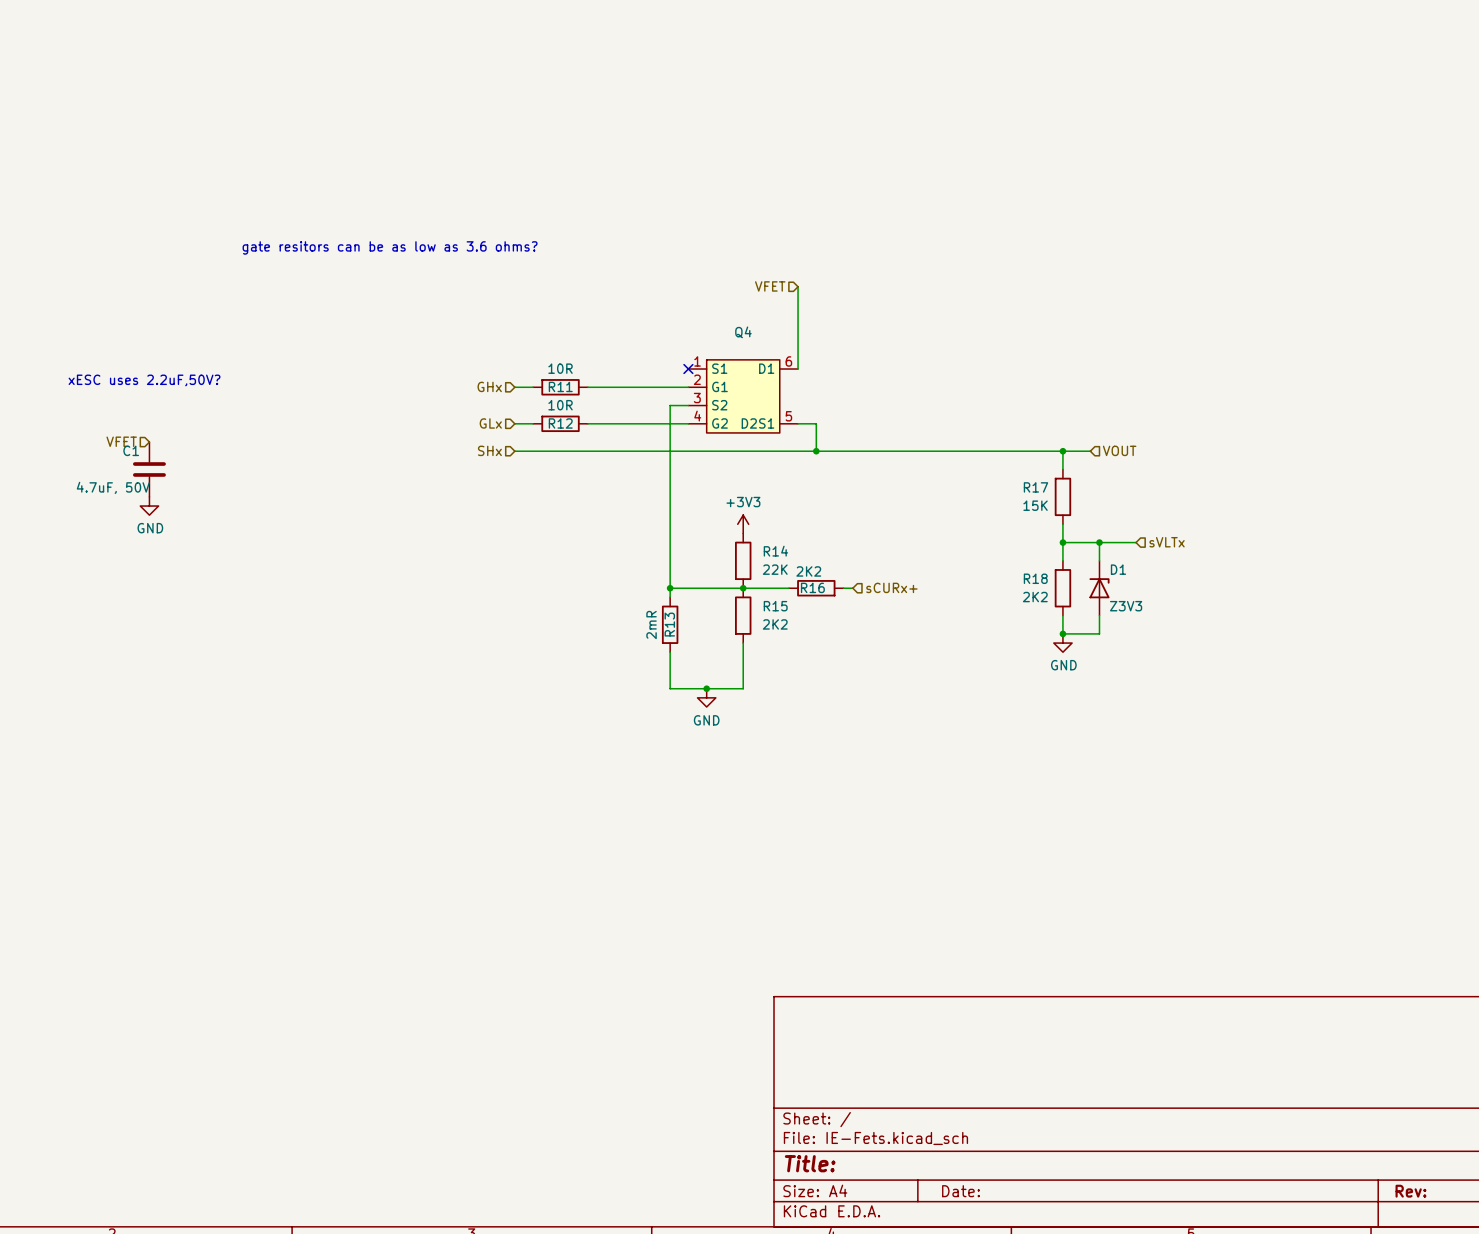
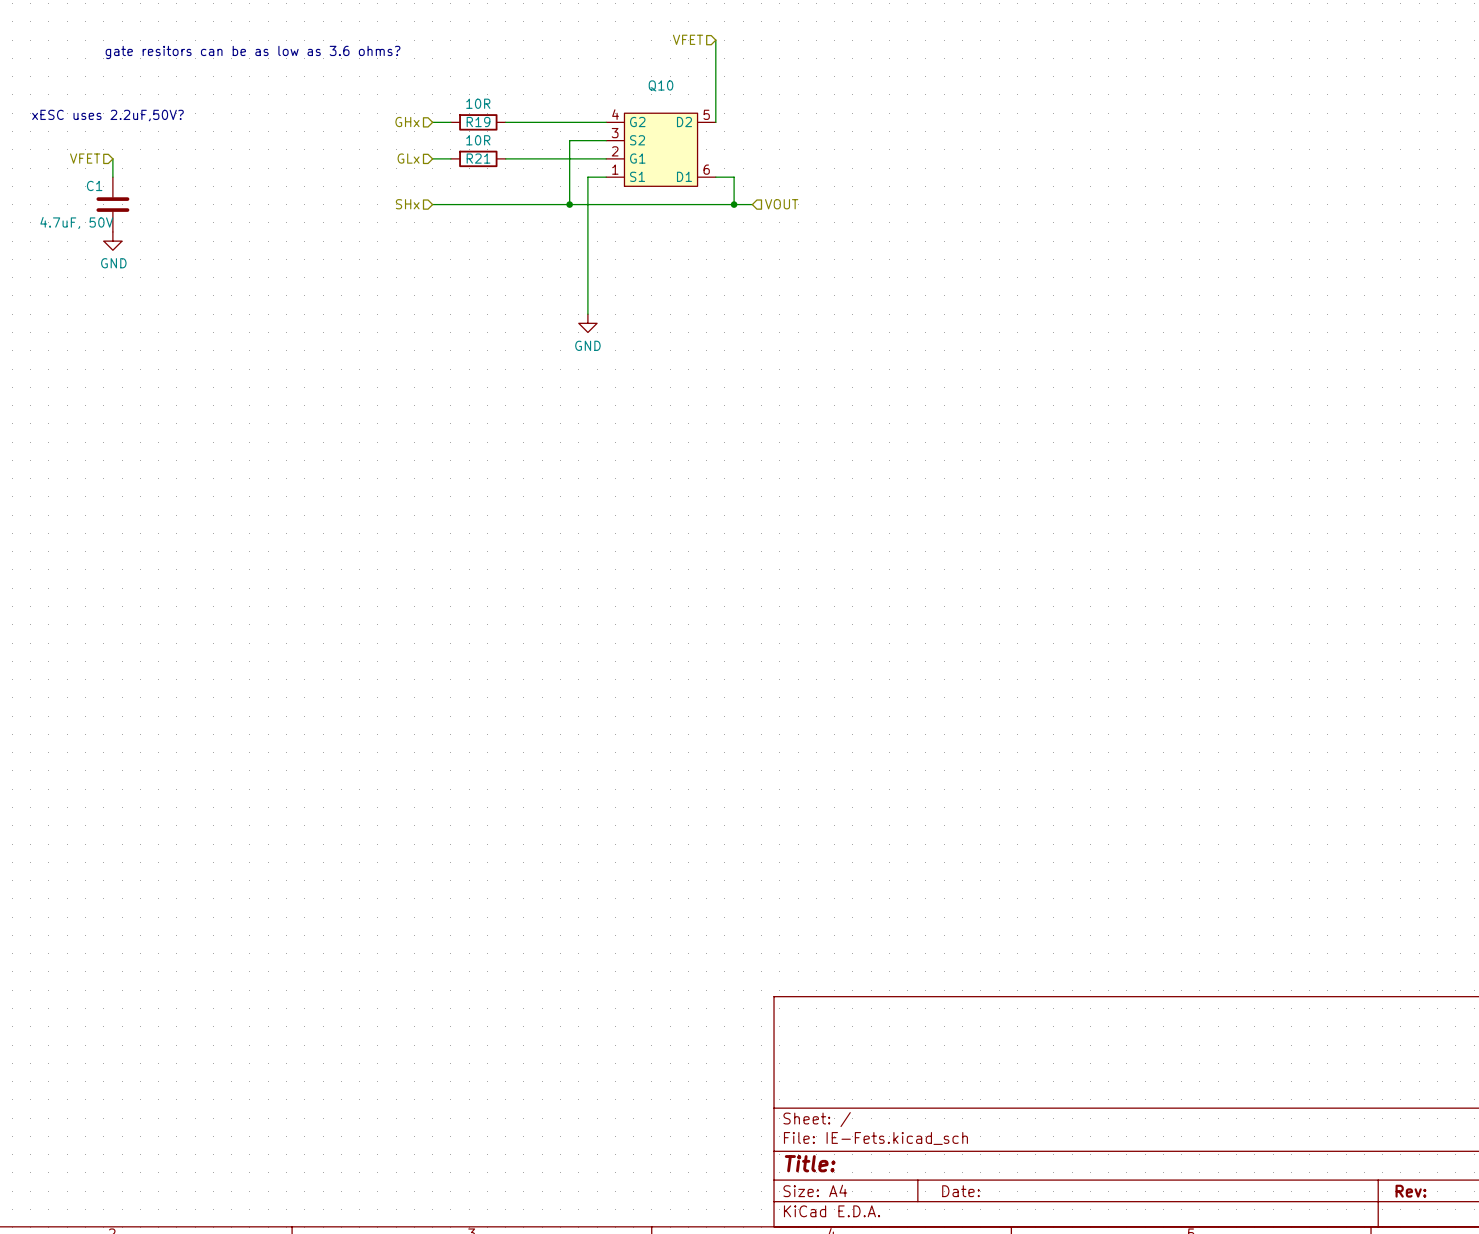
hierarchical label: none -> VFET (688, 39)
wire: none -> (715, 40) (715, 122)
text: none -> gate resitors can be as low as 3.6 ohms? (253, 52)
text: none -> xESC uses 2.2uF,50V? (107, 115)
hierarchical label: none -> GHx (407, 122)
wire: none -> (432, 122) (450, 122)
R19: none -> 10R (478, 122)
wire: none -> (505, 122) (606, 122)
wire: none -> (606, 140) (569, 140) (569, 204)
Q10: none -> (661, 149)
hierarchical label: none -> VFET (85, 158)
wire: none -> (112, 158) (112, 177)
hierarchical label: none -> GLx (408, 158)
wire: none -> (432, 158) (450, 158)
R21: none -> 10R (478, 158)
wire: none -> (505, 158) (606, 158)
wire: none -> (606, 177) (587, 177) (587, 314)
wire: none -> (715, 177) (734, 177) (734, 204)
hierarchical label: none -> SHx (407, 204)
wire: none -> (432, 204) (752, 204)
junction: none -> (569, 204)
junction: none -> (734, 204)
hierarchical label: none -> VOUT (781, 204)
power symbol: none -> GND (112, 241)
text: gate resitors can be as low as 3.6 ohms? (390, 247) -> none
hierarchical label: VFET (770, 286) -> none
wire: (798, 286) (798, 369) -> none
power symbol: none -> GND (587, 323)
no-connect mark: (688, 369) -> none
text: xESC uses 2.2uF,50V? (144, 380) -> none
hierarchical label: GHx (489, 386) -> none
wire: (514, 387) (533, 387) -> none
R11: 10R (560, 387) -> none
wire: (587, 387) (688, 387) -> none
Q4: (743, 396) -> none
wire: (688, 405) (670, 405) (670, 597) -> none
hierarchical label: GLx (490, 423) -> none
wire: (514, 423) (533, 423) -> none
R12: 10R (560, 423) -> none
wire: (587, 423) (688, 423) -> none
wire: (798, 423) (816, 423) (816, 451) -> none
hierarchical label: VFET (121, 441) -> none
hierarchical label: SHx (489, 450) -> none
hierarchical label: VOUT (1119, 450) -> none
wire: (514, 451) (1090, 451) -> none
junction: (816, 451) -> none
wire: (1062, 451) (1062, 469) -> none
junction: (1062, 451) -> none
C1 position: (149, 469) -> (112, 204)
R17: 15K (1062, 496) -> none
power symbol: GND (149, 506) -> none
power symbol: +3V3 (743, 524) -> none
wire: (1062, 524) (1062, 560) -> none
wire: (1062, 542) (1136, 542) -> none
junction: (1062, 542) -> none
wire: (1099, 542) (1099, 560) -> none
junction: (1099, 542) -> none
hierarchical label: sVLTx (1167, 542) -> none
R14: 22K (743, 560) -> none
hierarchical label: sCURx+ (891, 587) -> none
wire: (670, 588) (788, 588) -> none
junction: (670, 588) -> none
junction: (743, 588) -> none
R16: 2K2 (816, 588) -> none
wire: (843, 588) (852, 588) -> none
R18: 2K2 (1062, 588) -> none
D1: Z3V3 (1099, 588) -> none
R15: 2K2 (743, 615) -> none
wire: (1062, 615) (1062, 633) (1099, 633) (1099, 615) -> none
R13: 2mR (670, 624) -> none
junction: (1062, 633) -> none
wire: (743, 643) (743, 688) (670, 688) (670, 652) -> none
power symbol: GND (1062, 643) -> none
junction: (706, 688) -> none
power symbol: GND (706, 697) -> none

